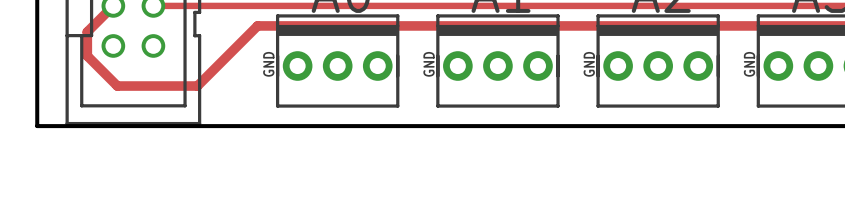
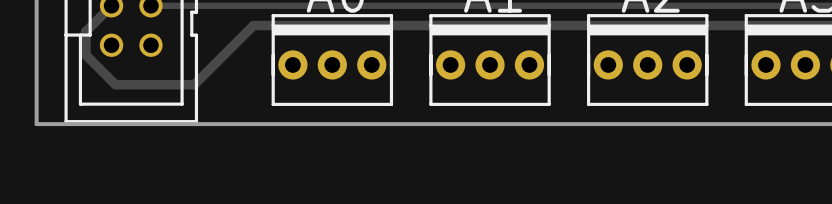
text: GND (268, 64) -> none
text: GND (429, 64) -> none
text: GND (589, 64) -> none
text: GND (749, 64) -> none

